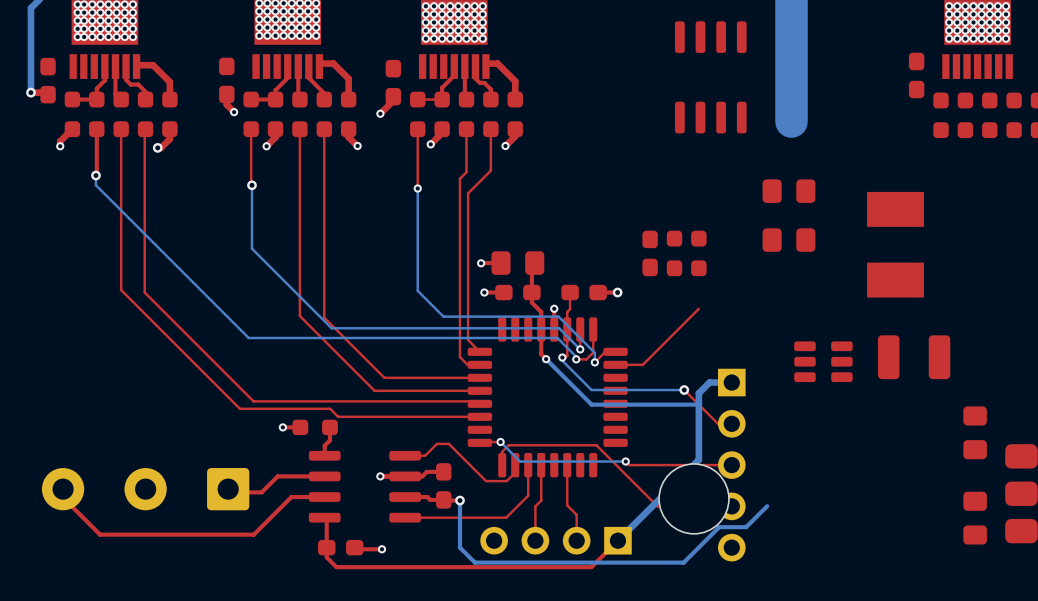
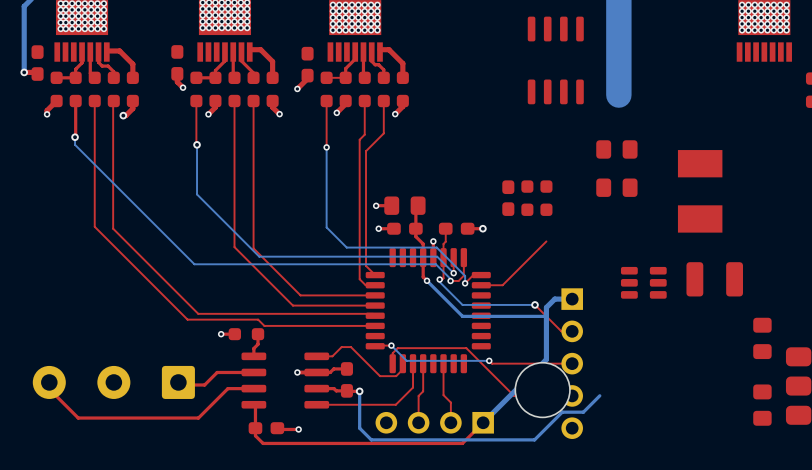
part: (916, 75) -> none
part: (941, 115) -> none
part: (965, 115) -> none
part: (989, 115) -> none
part: (1014, 115) -> none

